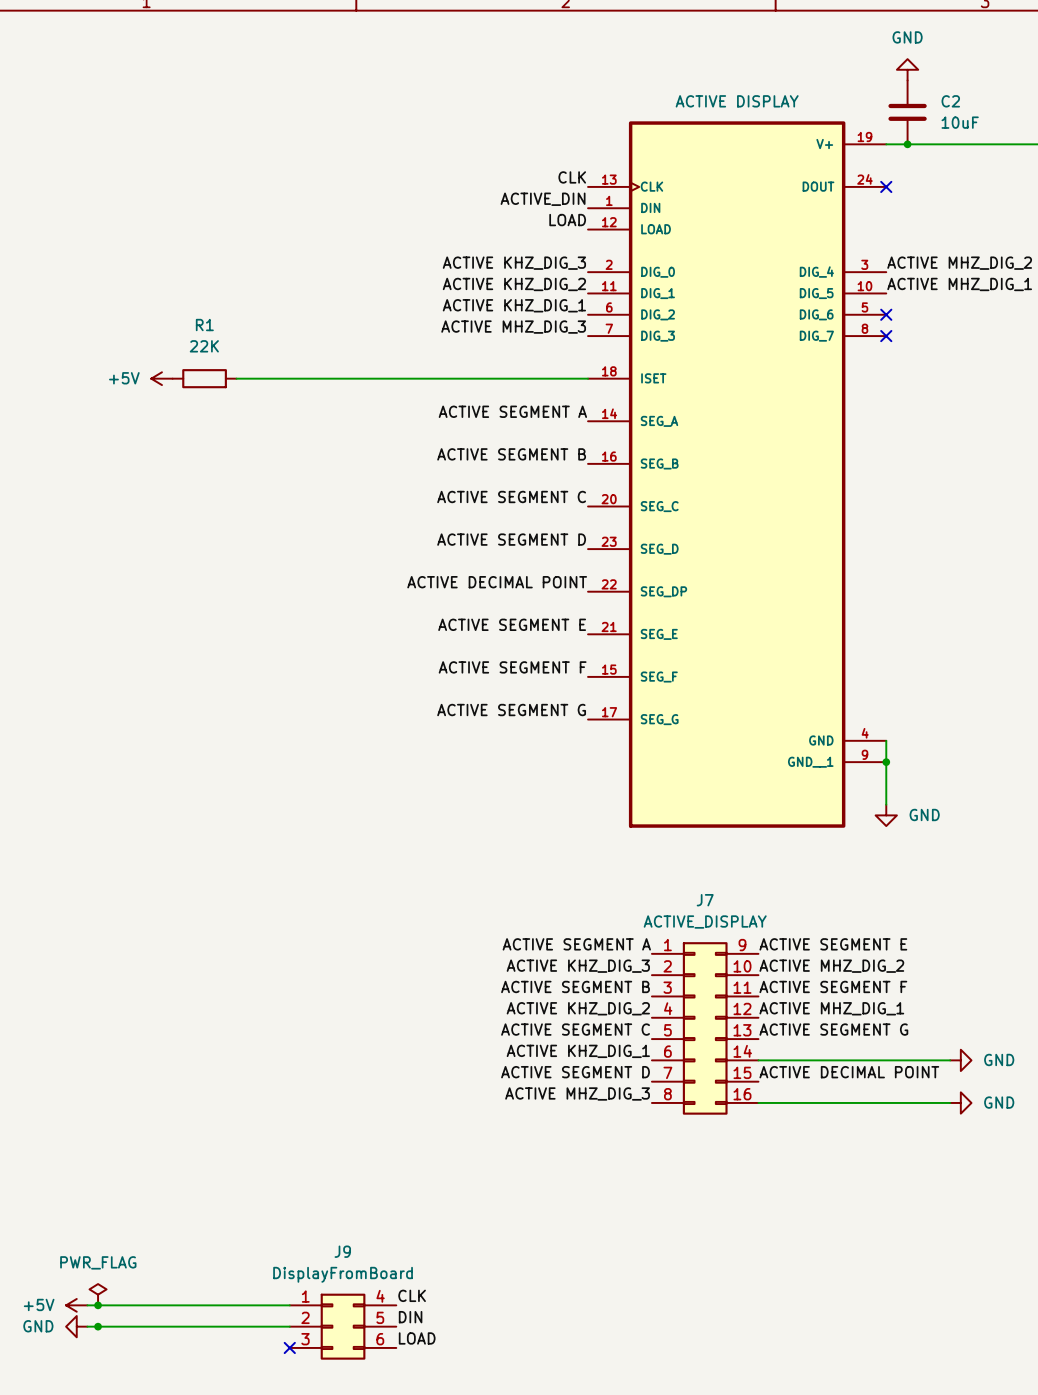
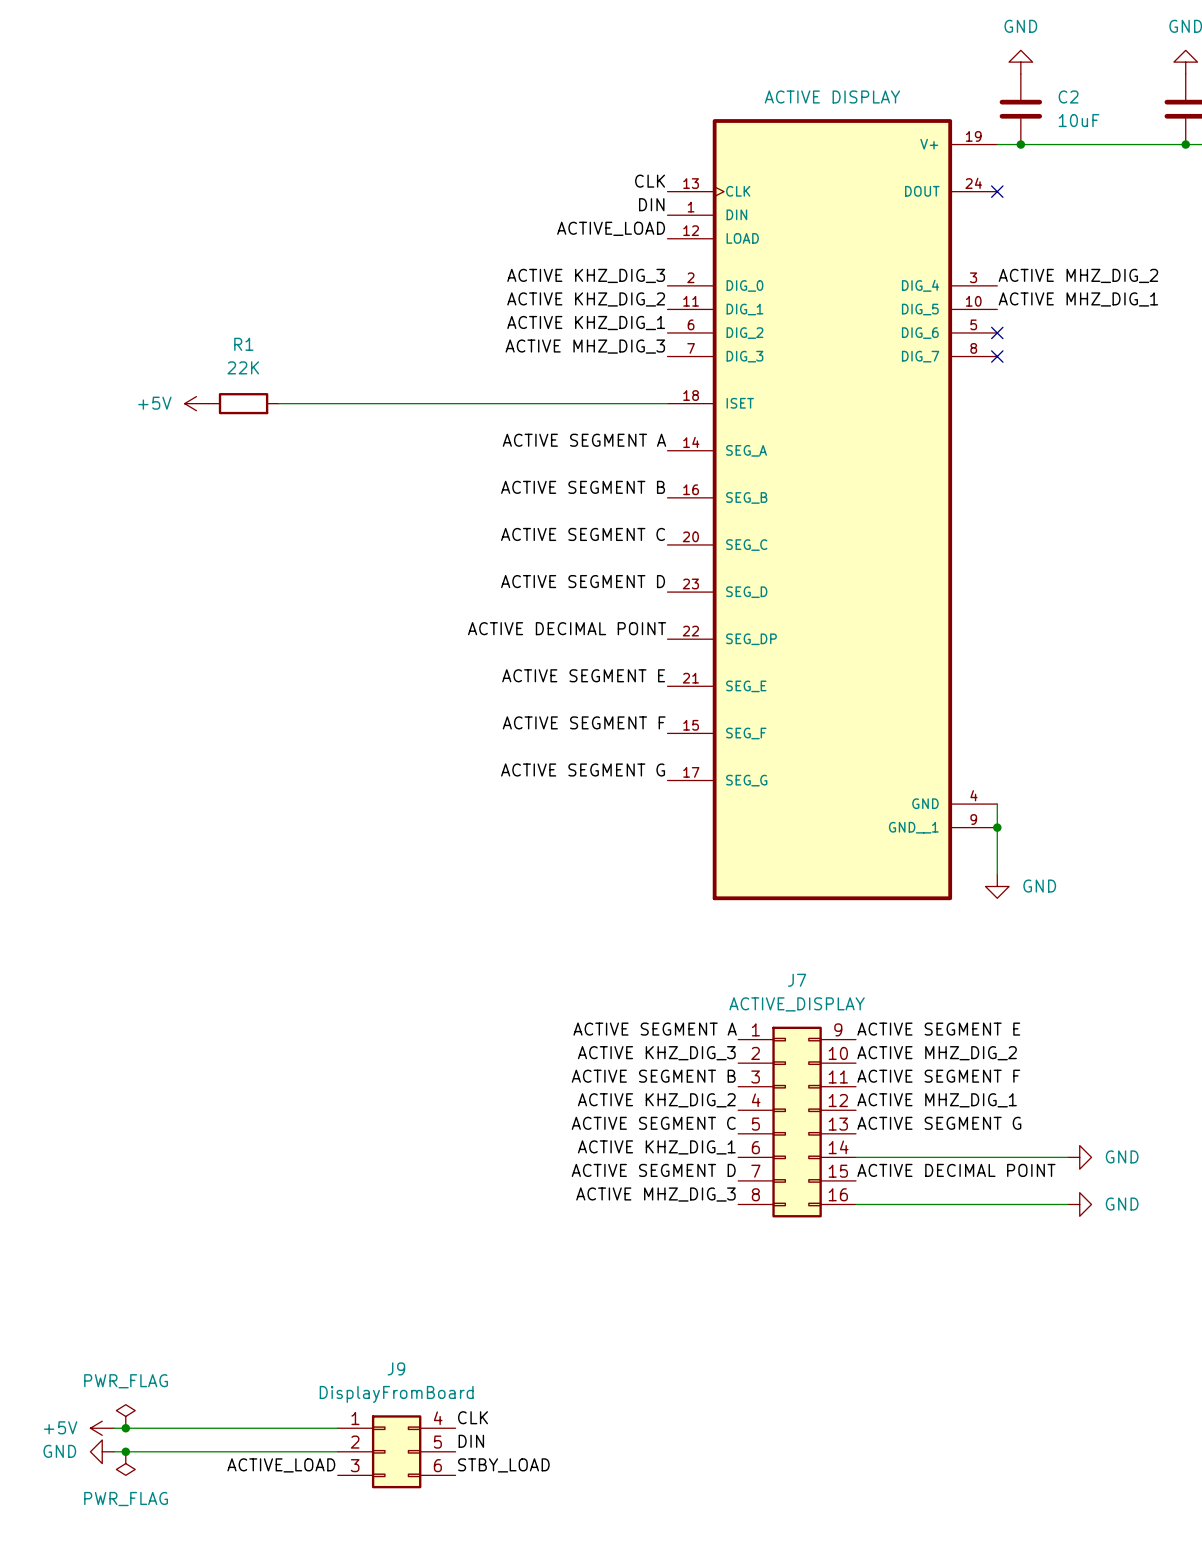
label: ACTIVE_DIN (543, 199) -> DIN (651, 204)
label: LOAD (567, 220) -> ACTIVE_LOAD (611, 228)
power symbol: none -> PWR_FLAG (125, 1463)
label: none -> ACTIVE_LOAD (281, 1465)
label: LOAD (417, 1338) -> STBY_LOAD (503, 1465)
no-connect mark: (289, 1347) -> none

